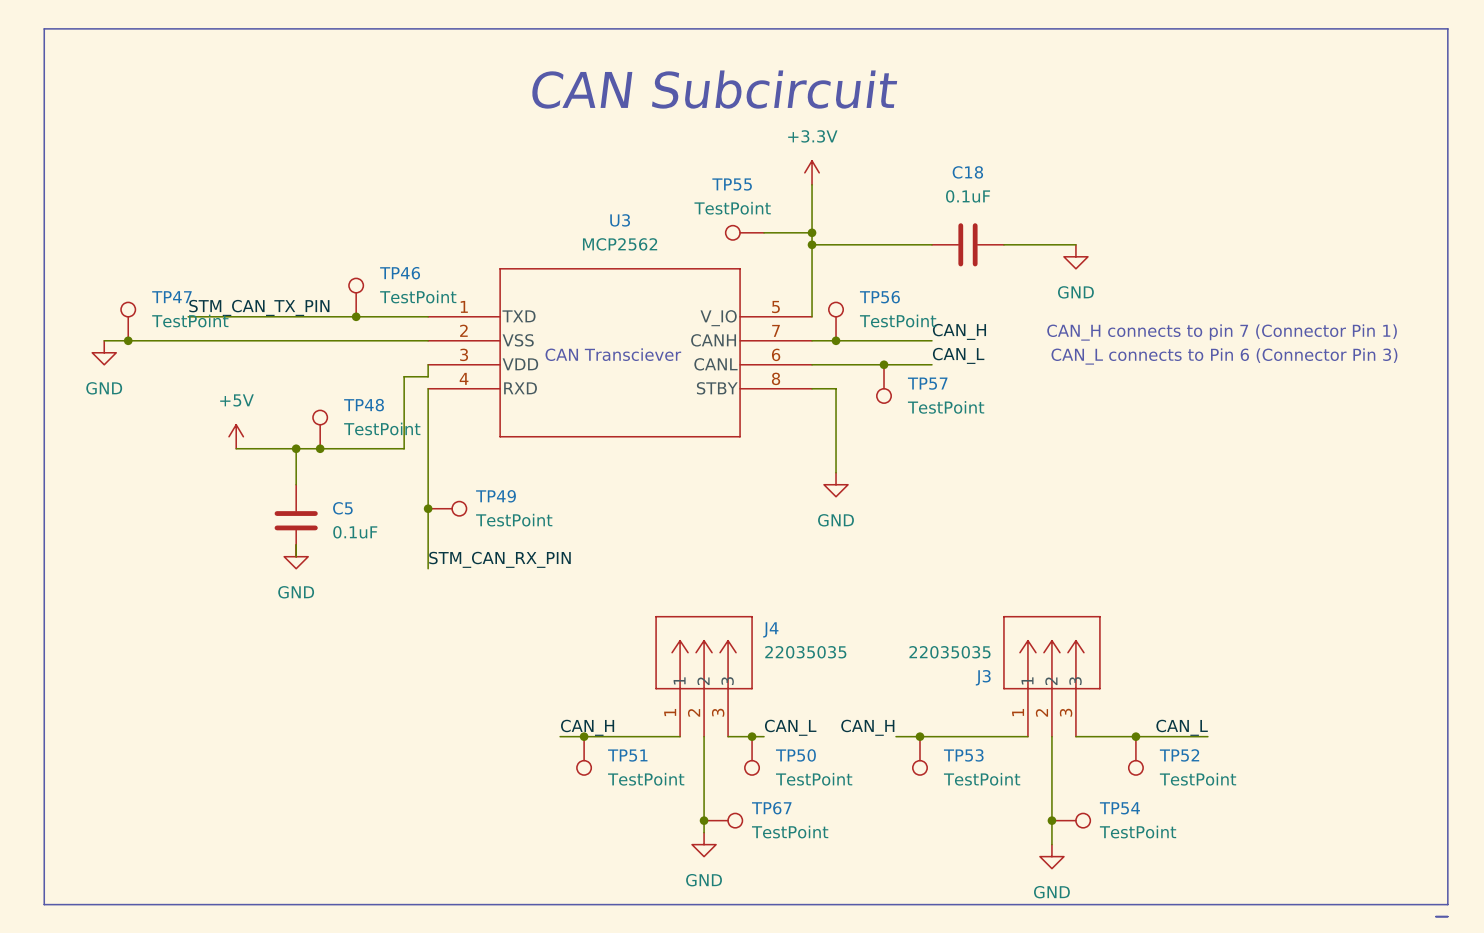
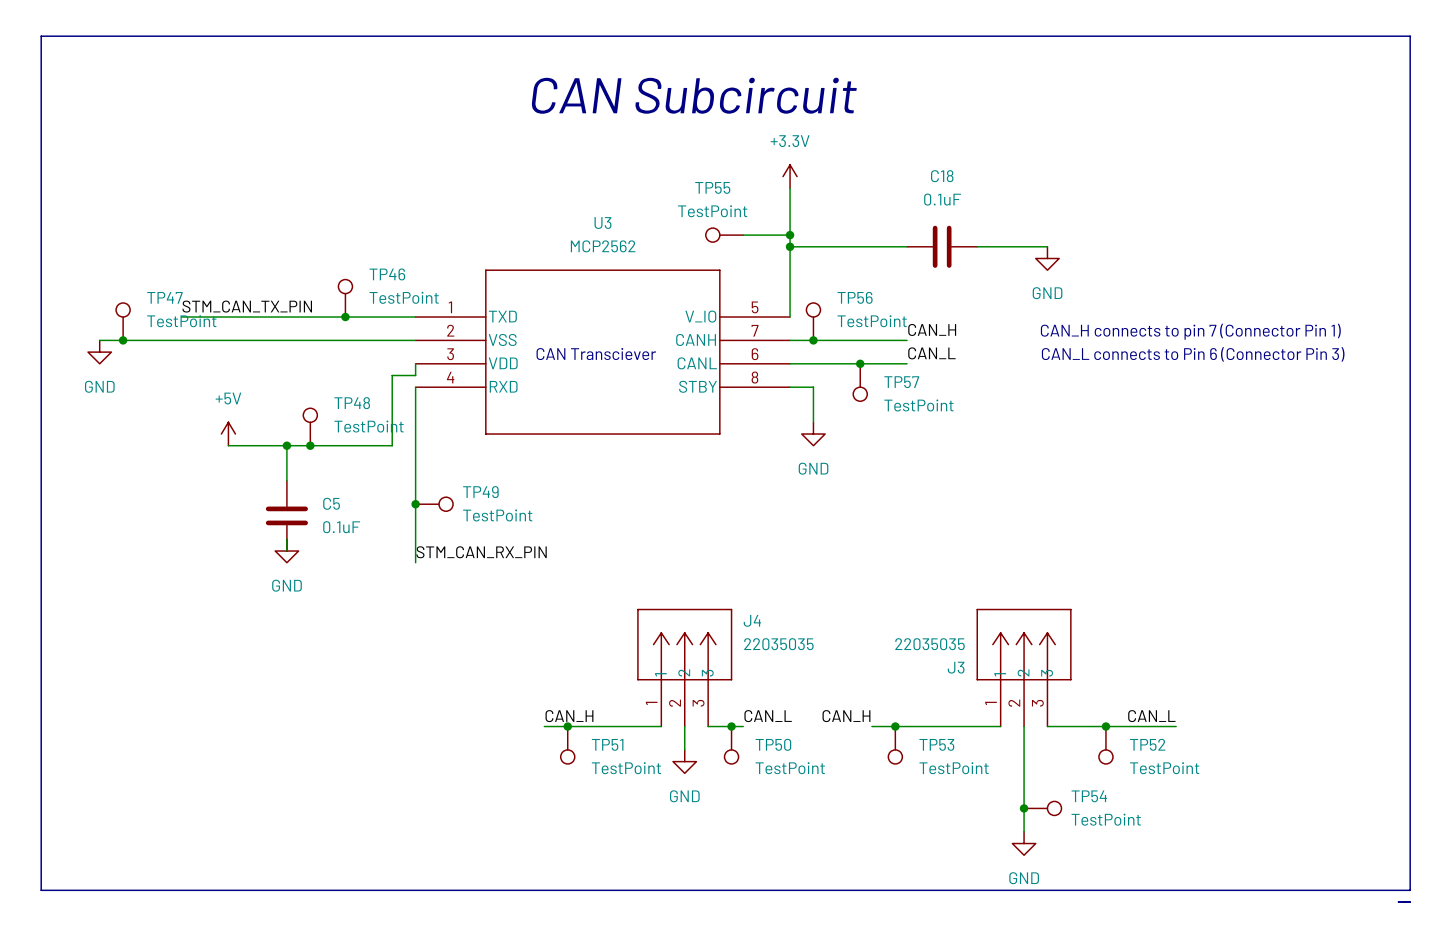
wire: (836, 424) (836, 472) -> none
power symbol position: GND (836, 484) -> GND (813, 434)
wire: (704, 760) (704, 832) -> none
junction: (704, 820) -> none
TP67: TestPoint (723, 820) -> none
power symbol position: GND (704, 844) -> GND (684, 761)

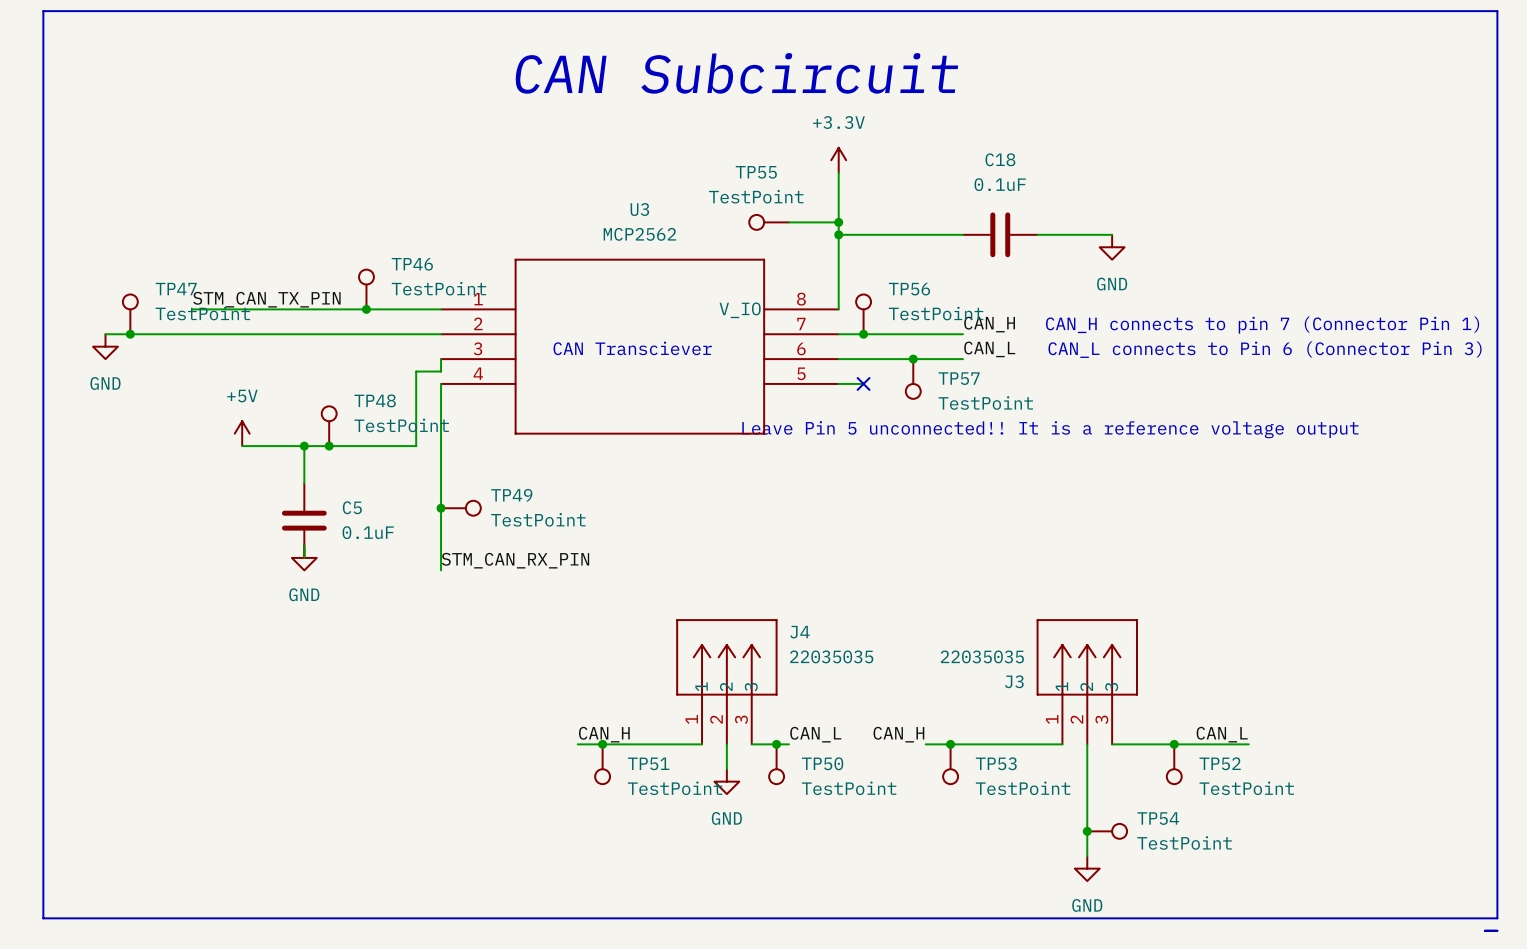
U3 symbol: [415, 269, 791, 435] -> [441, 259, 839, 435]
wire: (813, 387) (813, 422) -> none
no-connect mark: none -> (863, 383)
text: none -> Leave Pin 5 unconnected!! It is a reference voltage output (1050, 429)
power symbol: GND (813, 434) -> none

